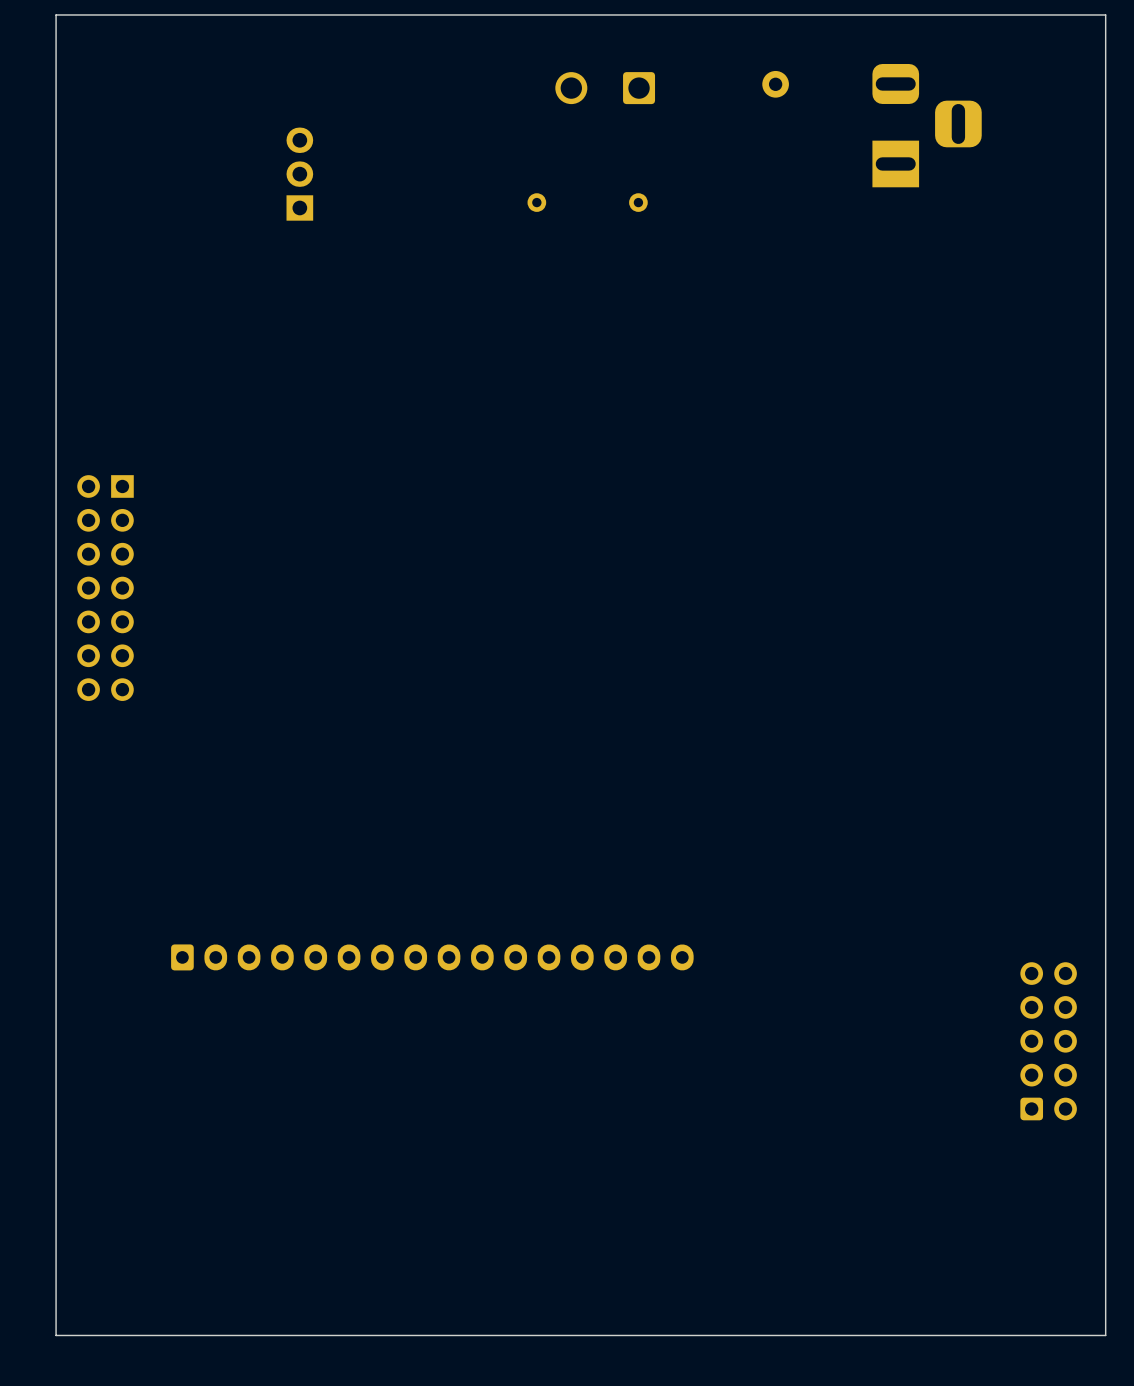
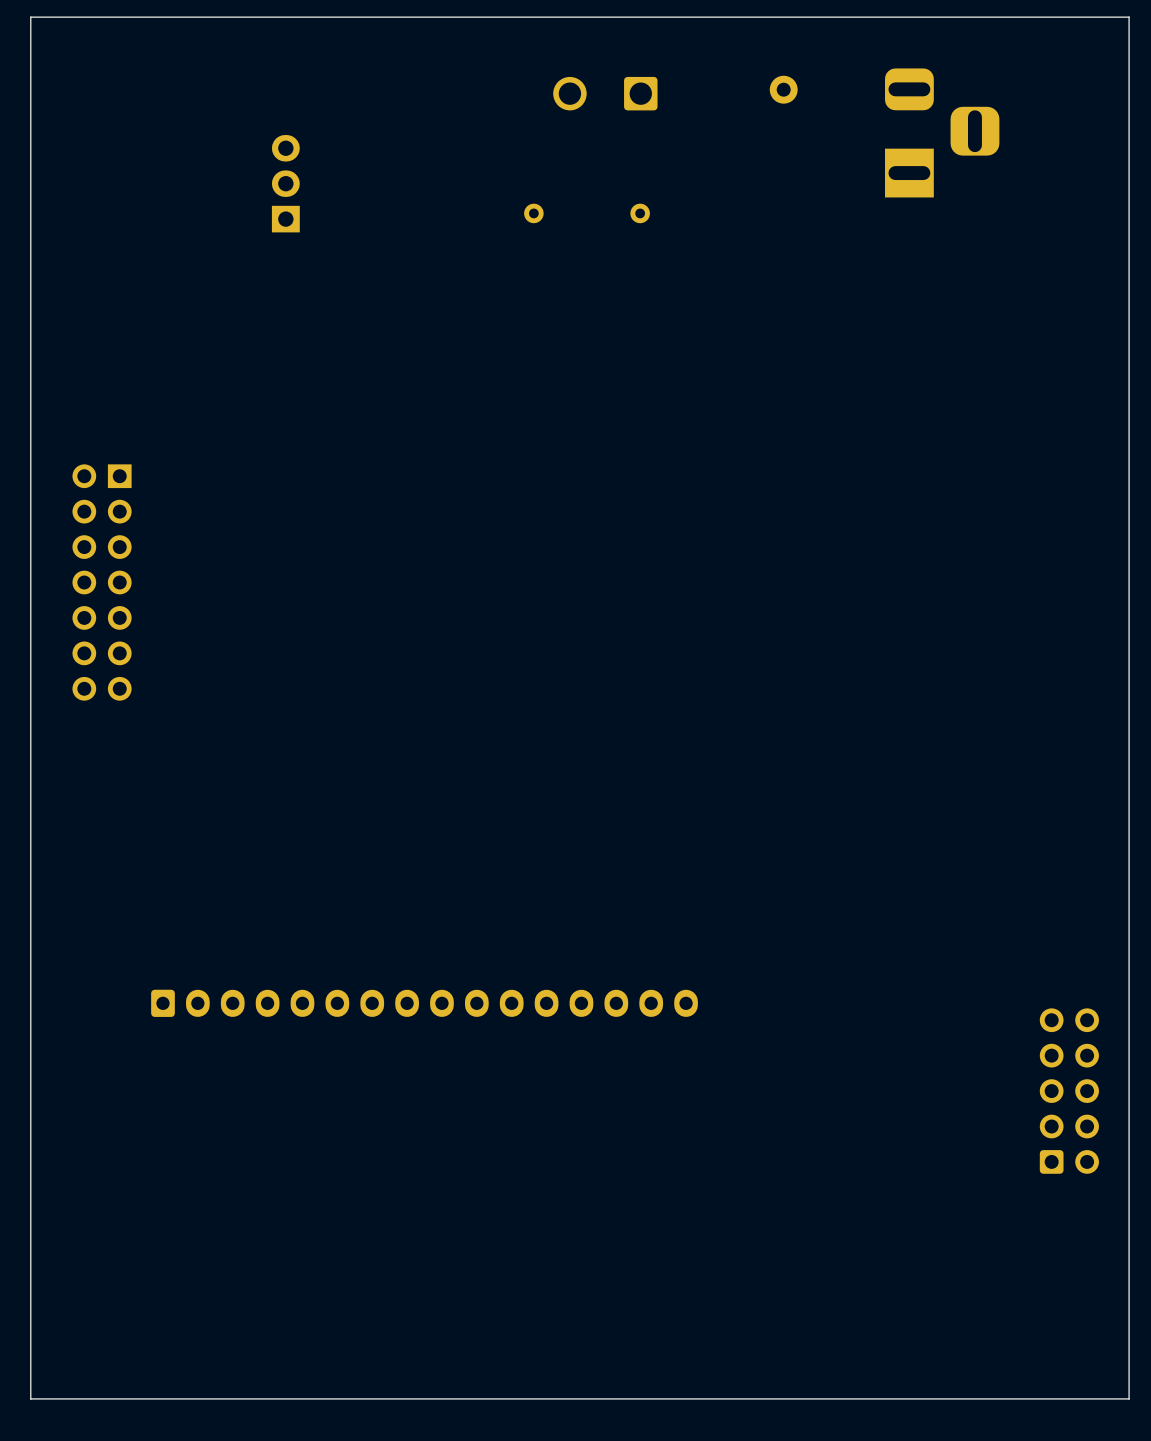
part position: (105, 588) -> (102, 582)

